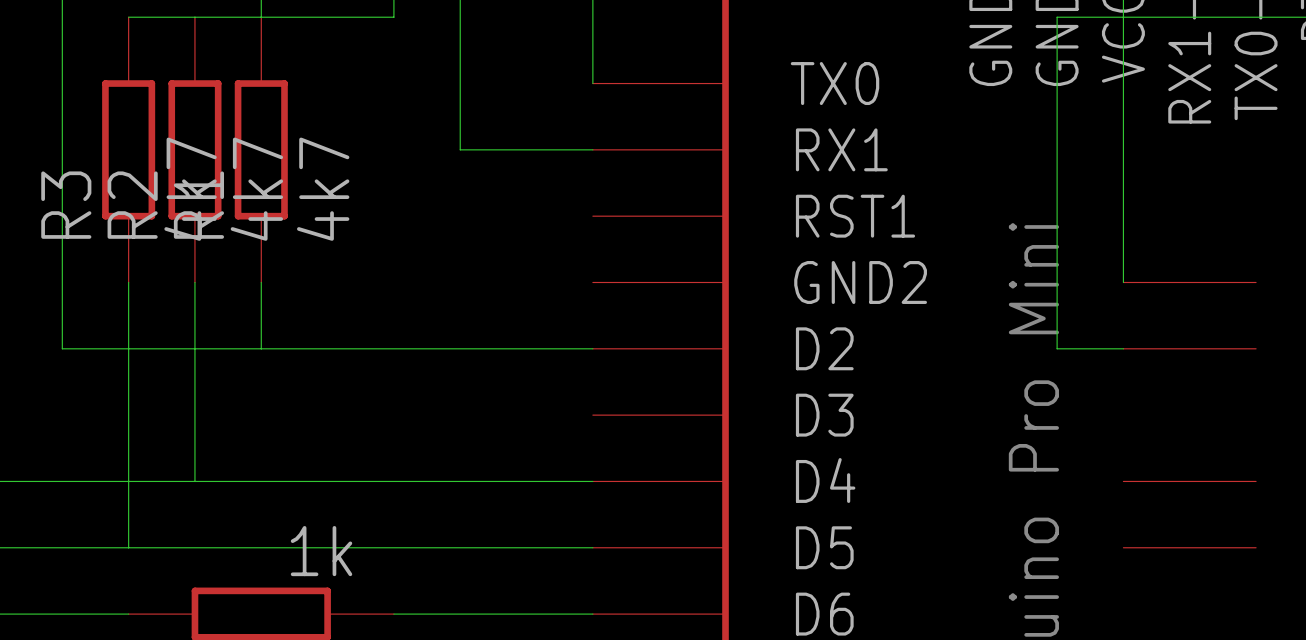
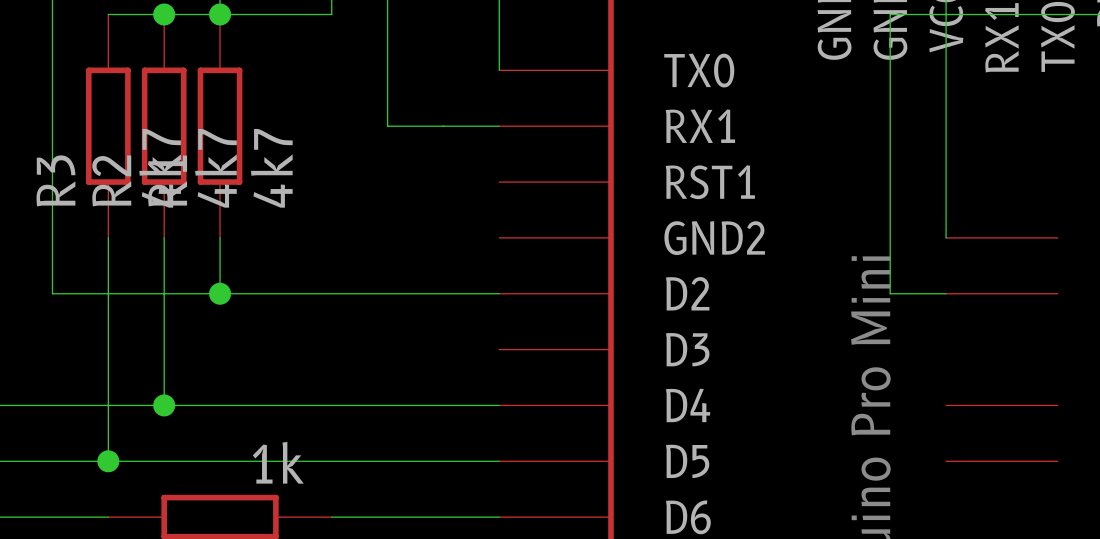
junction: none -> (164, 14)
junction: none -> (220, 14)
junction: none -> (220, 293)
junction: none -> (164, 405)
junction: none -> (108, 461)

